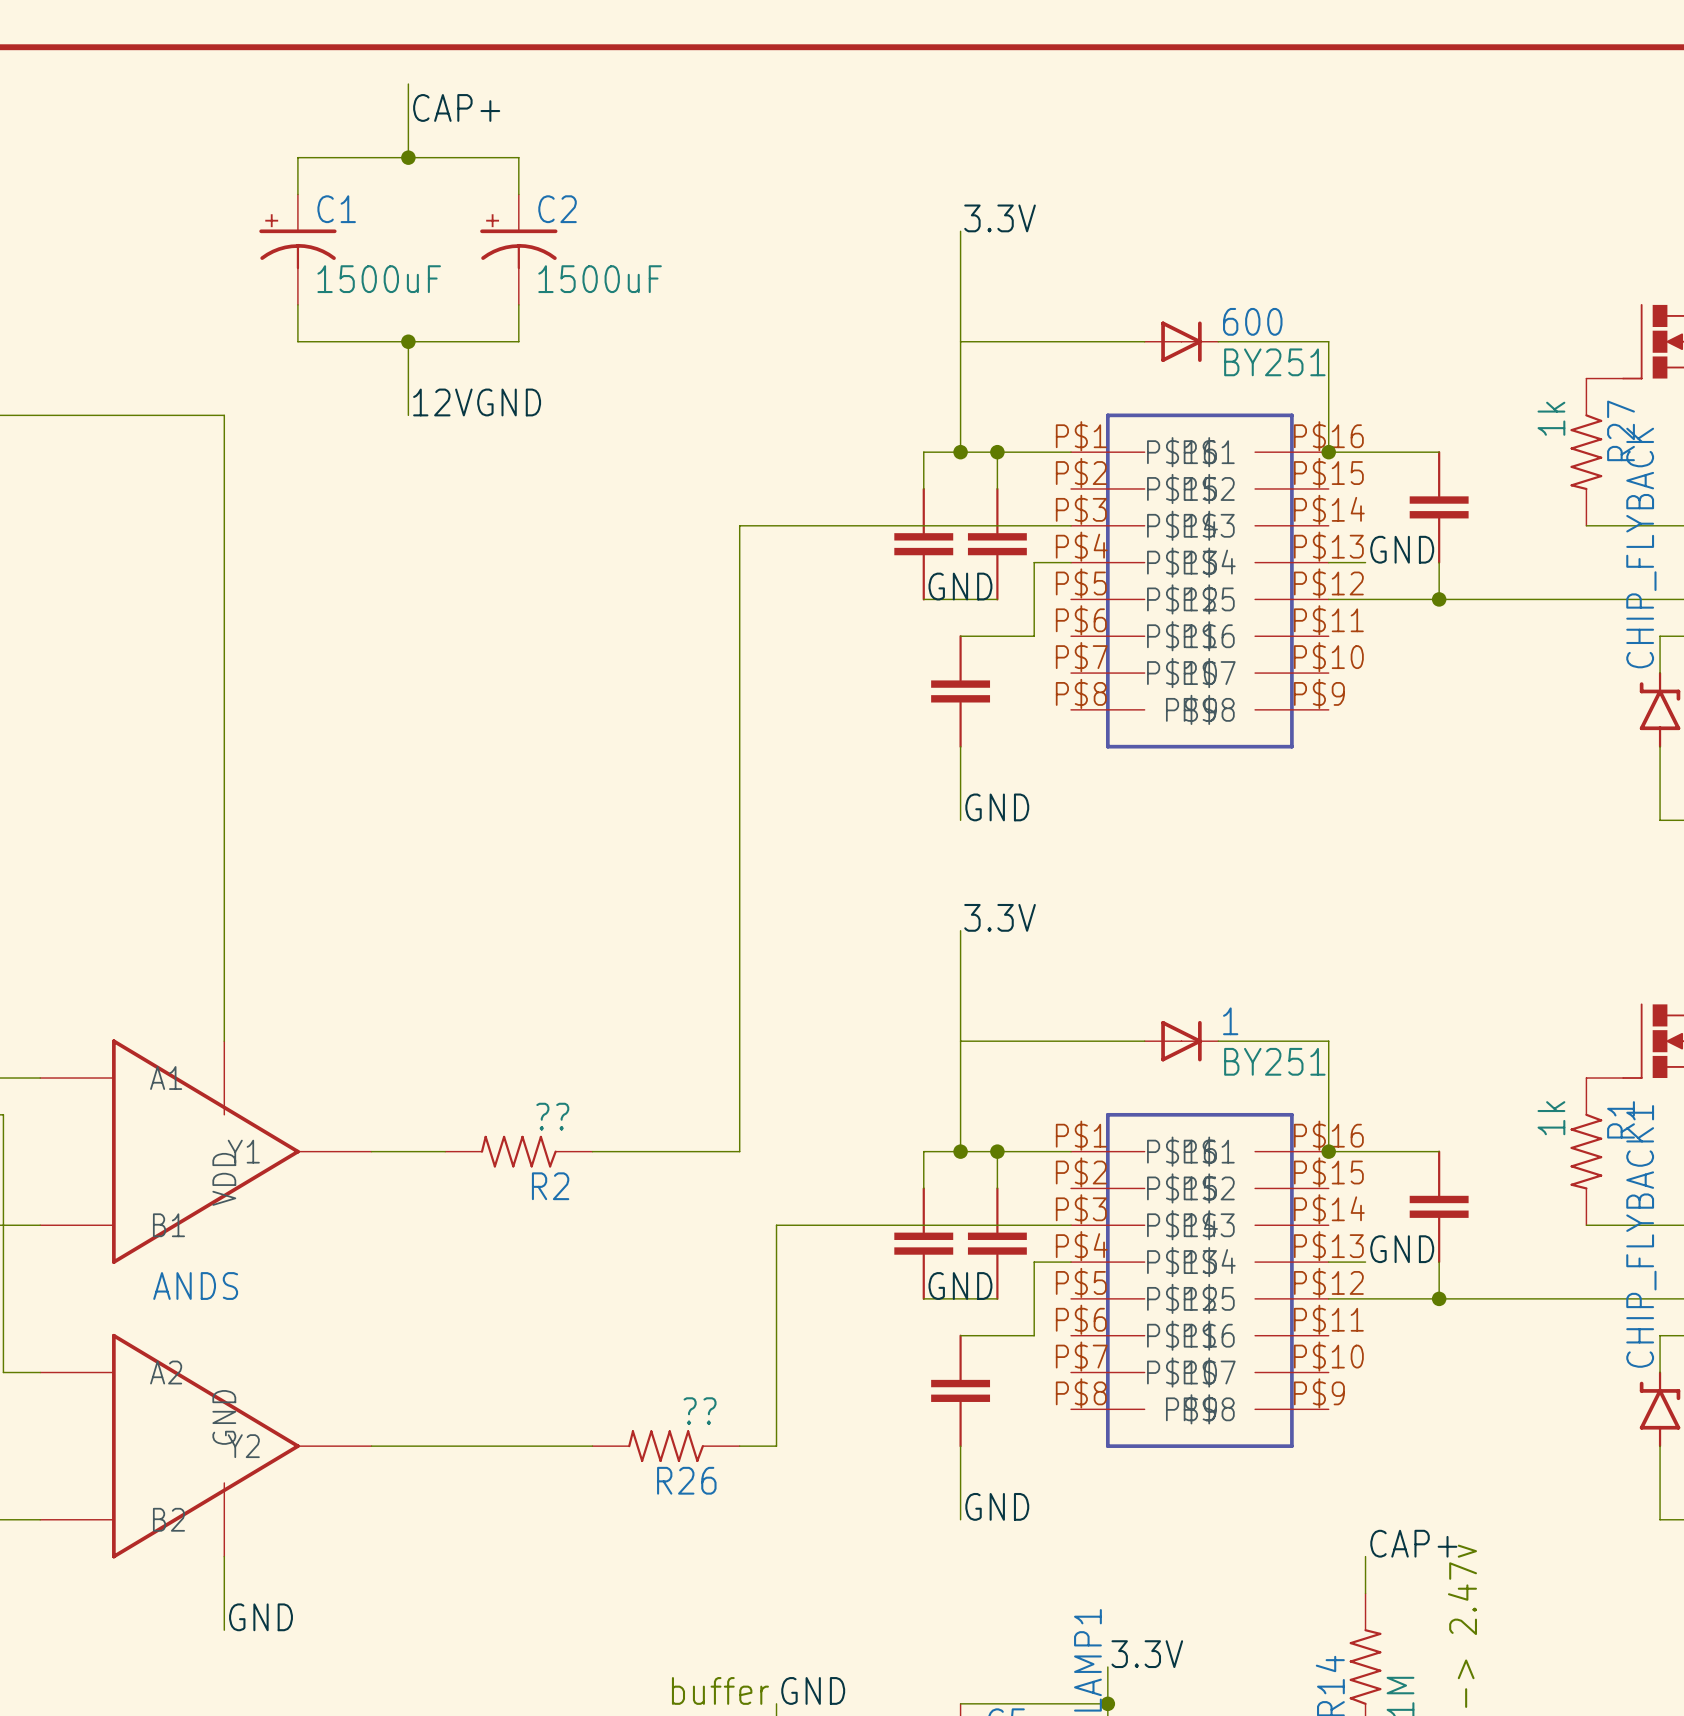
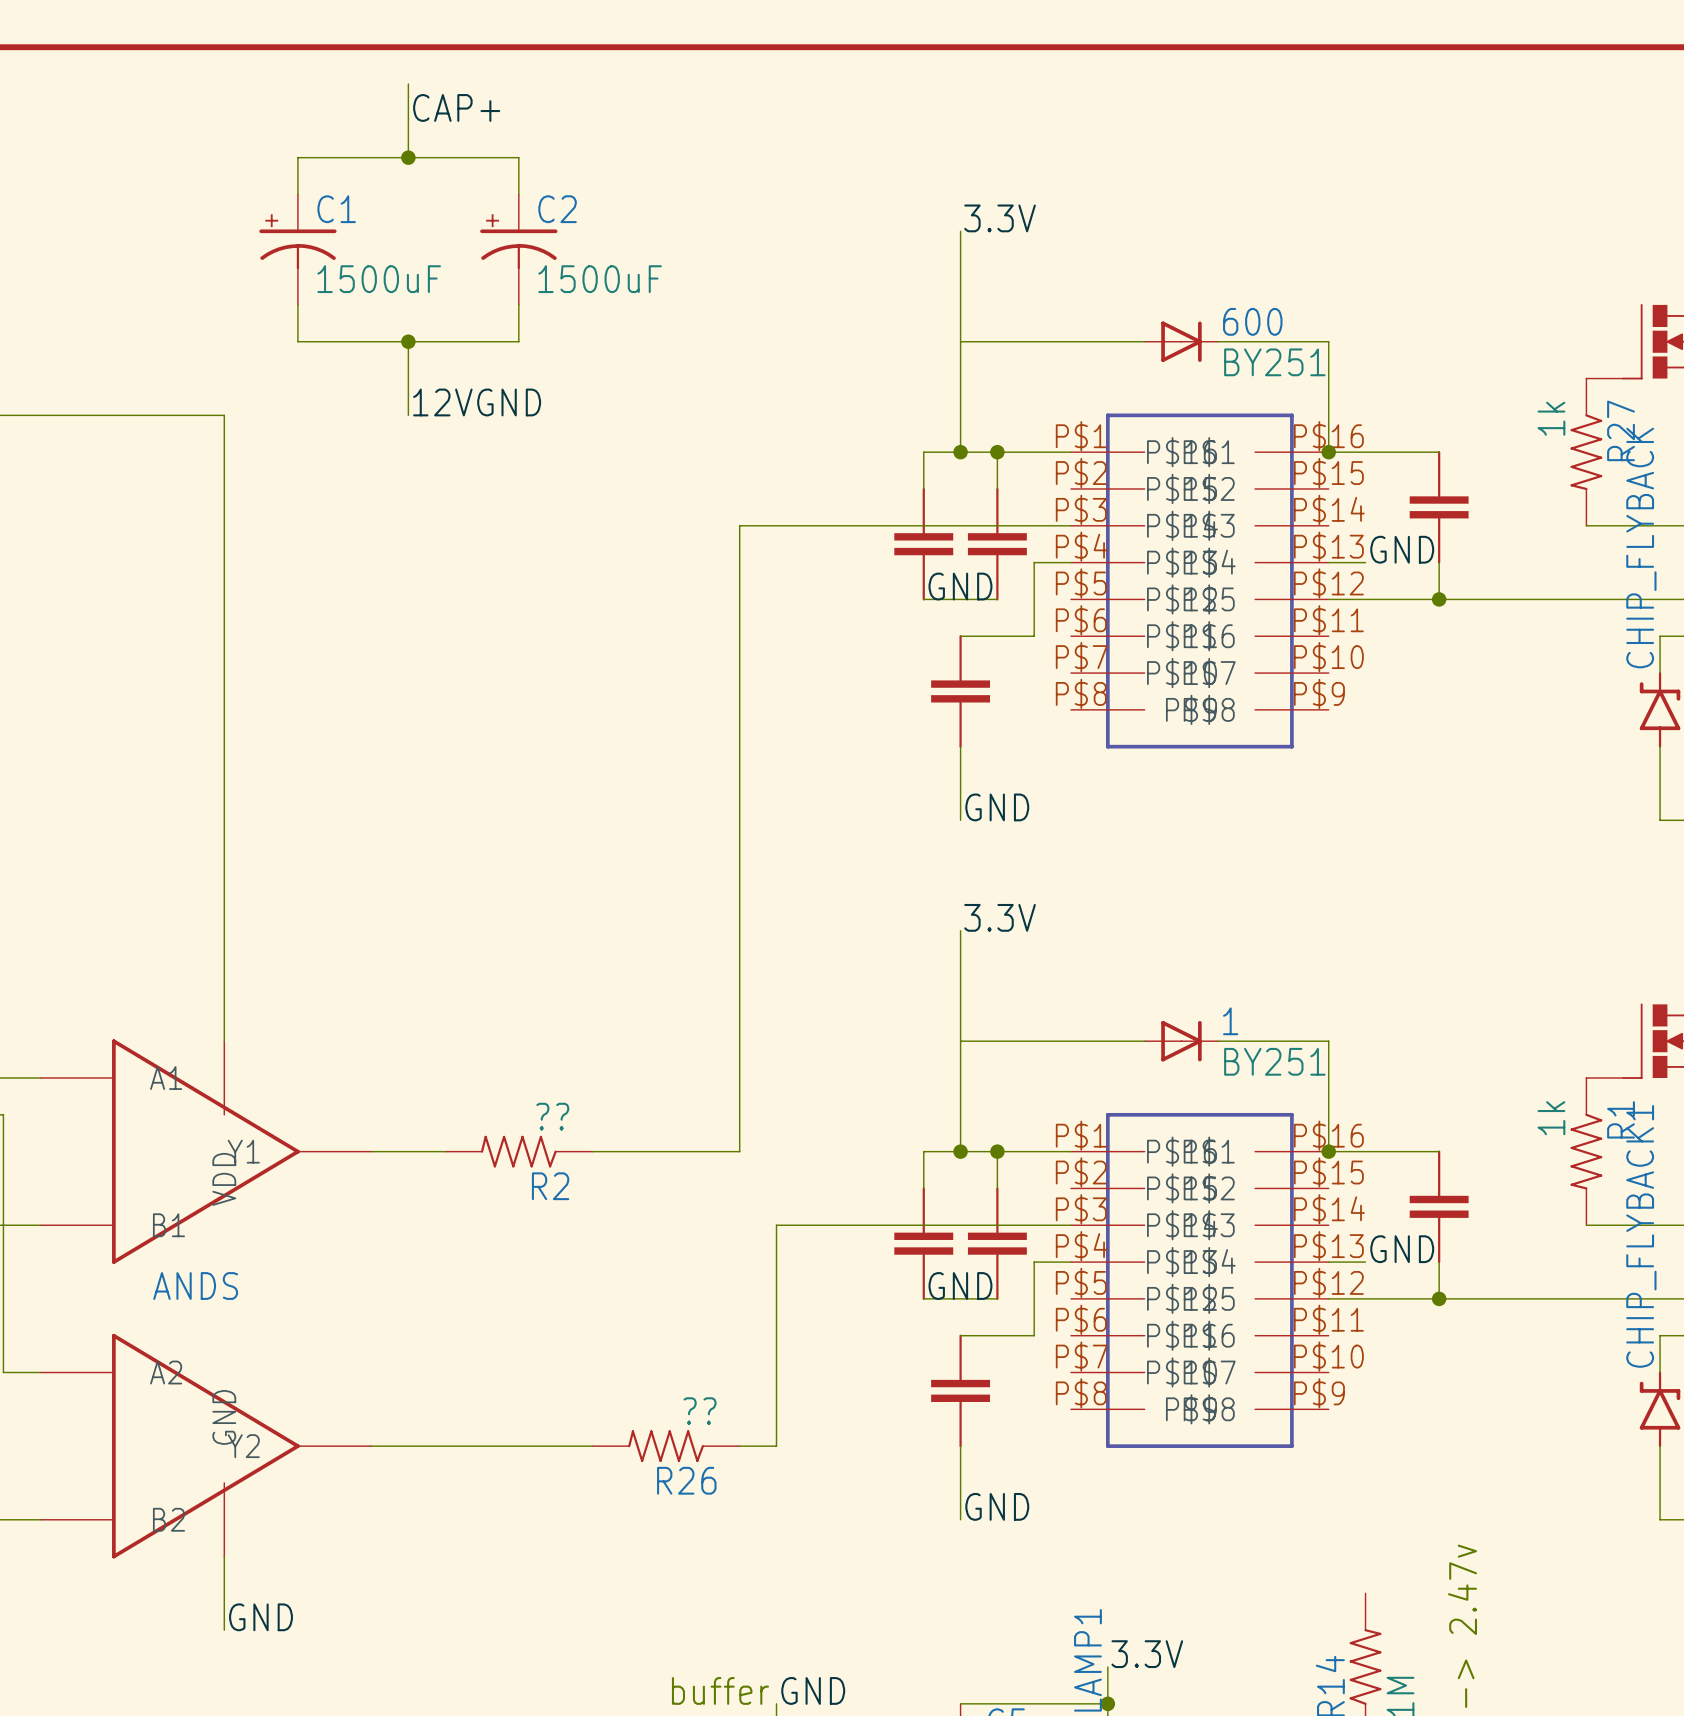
label: CAP+ (1413, 1543) -> none
wire: (1365, 1556) (1365, 1593) -> none

